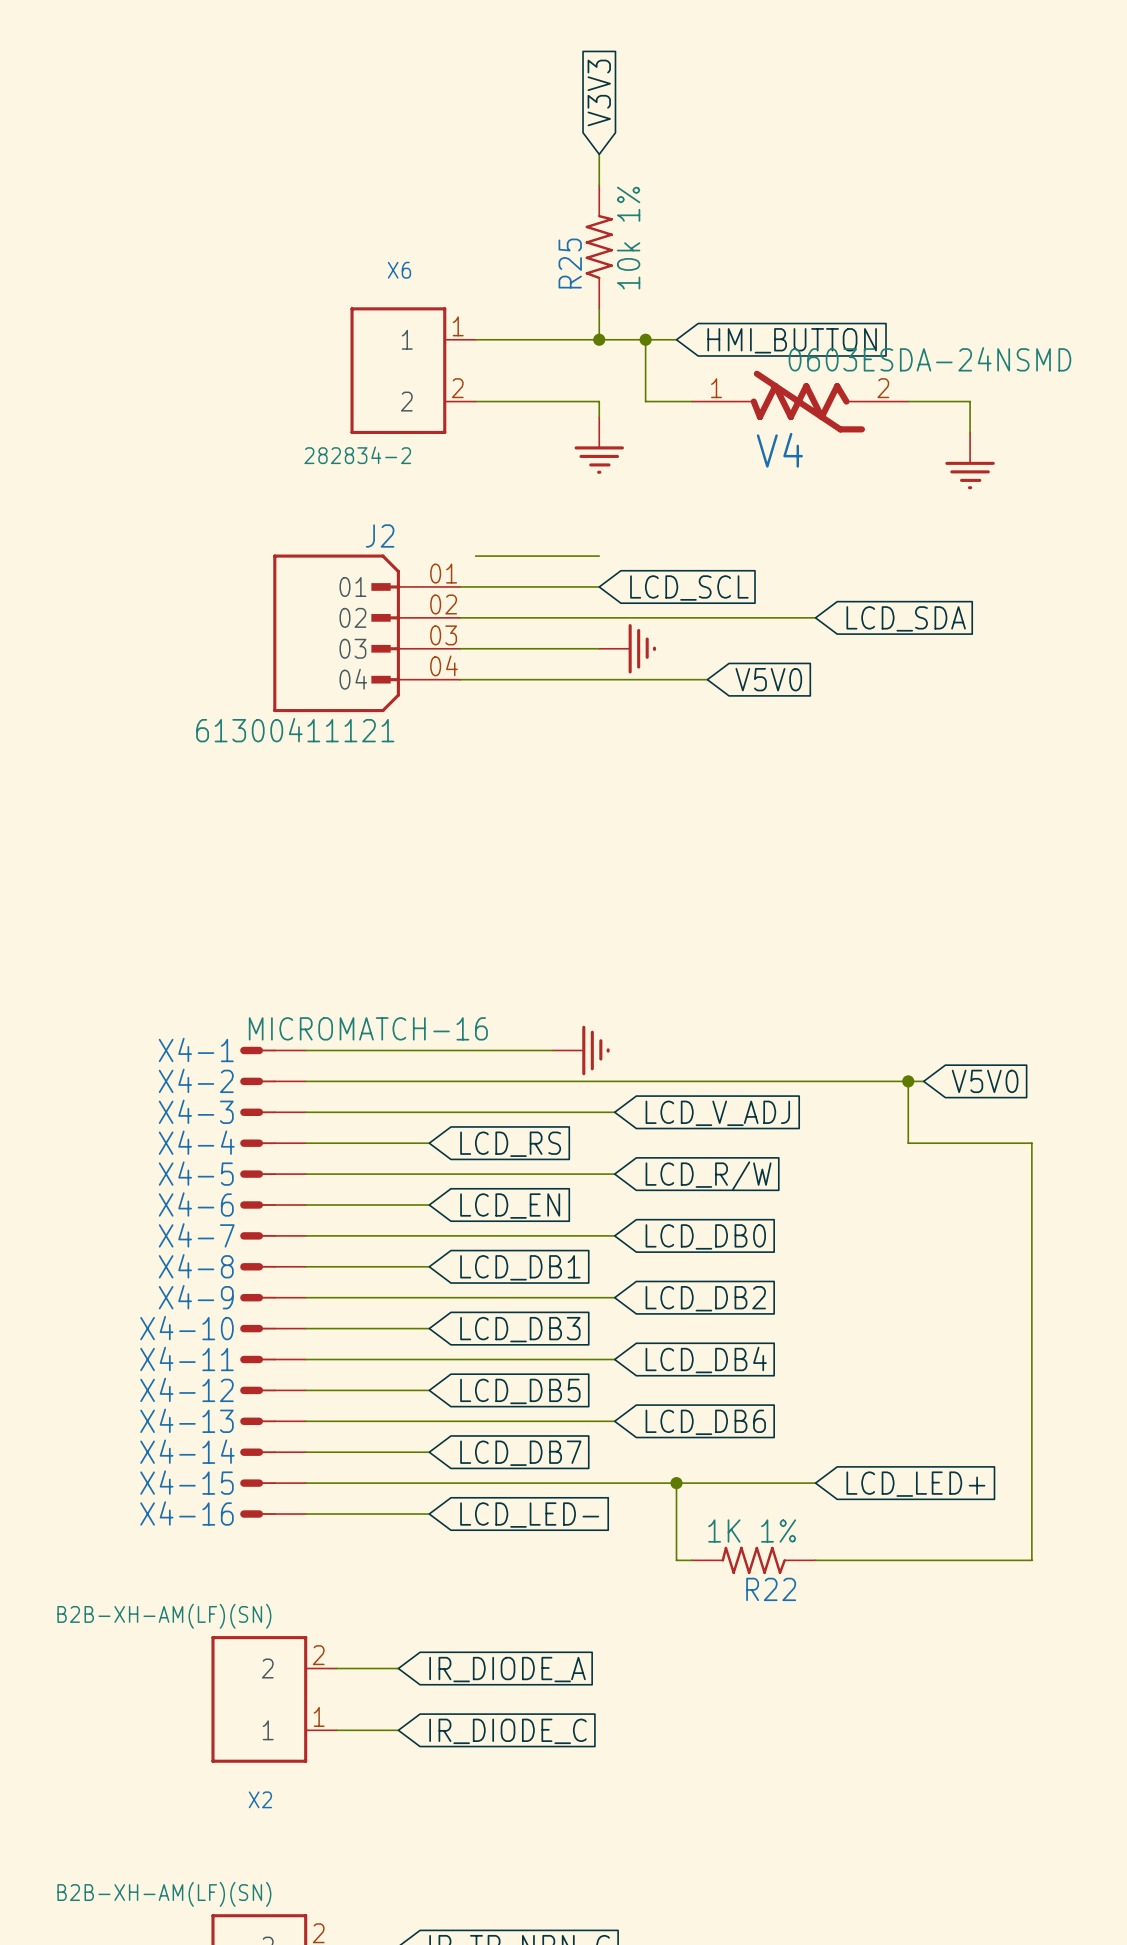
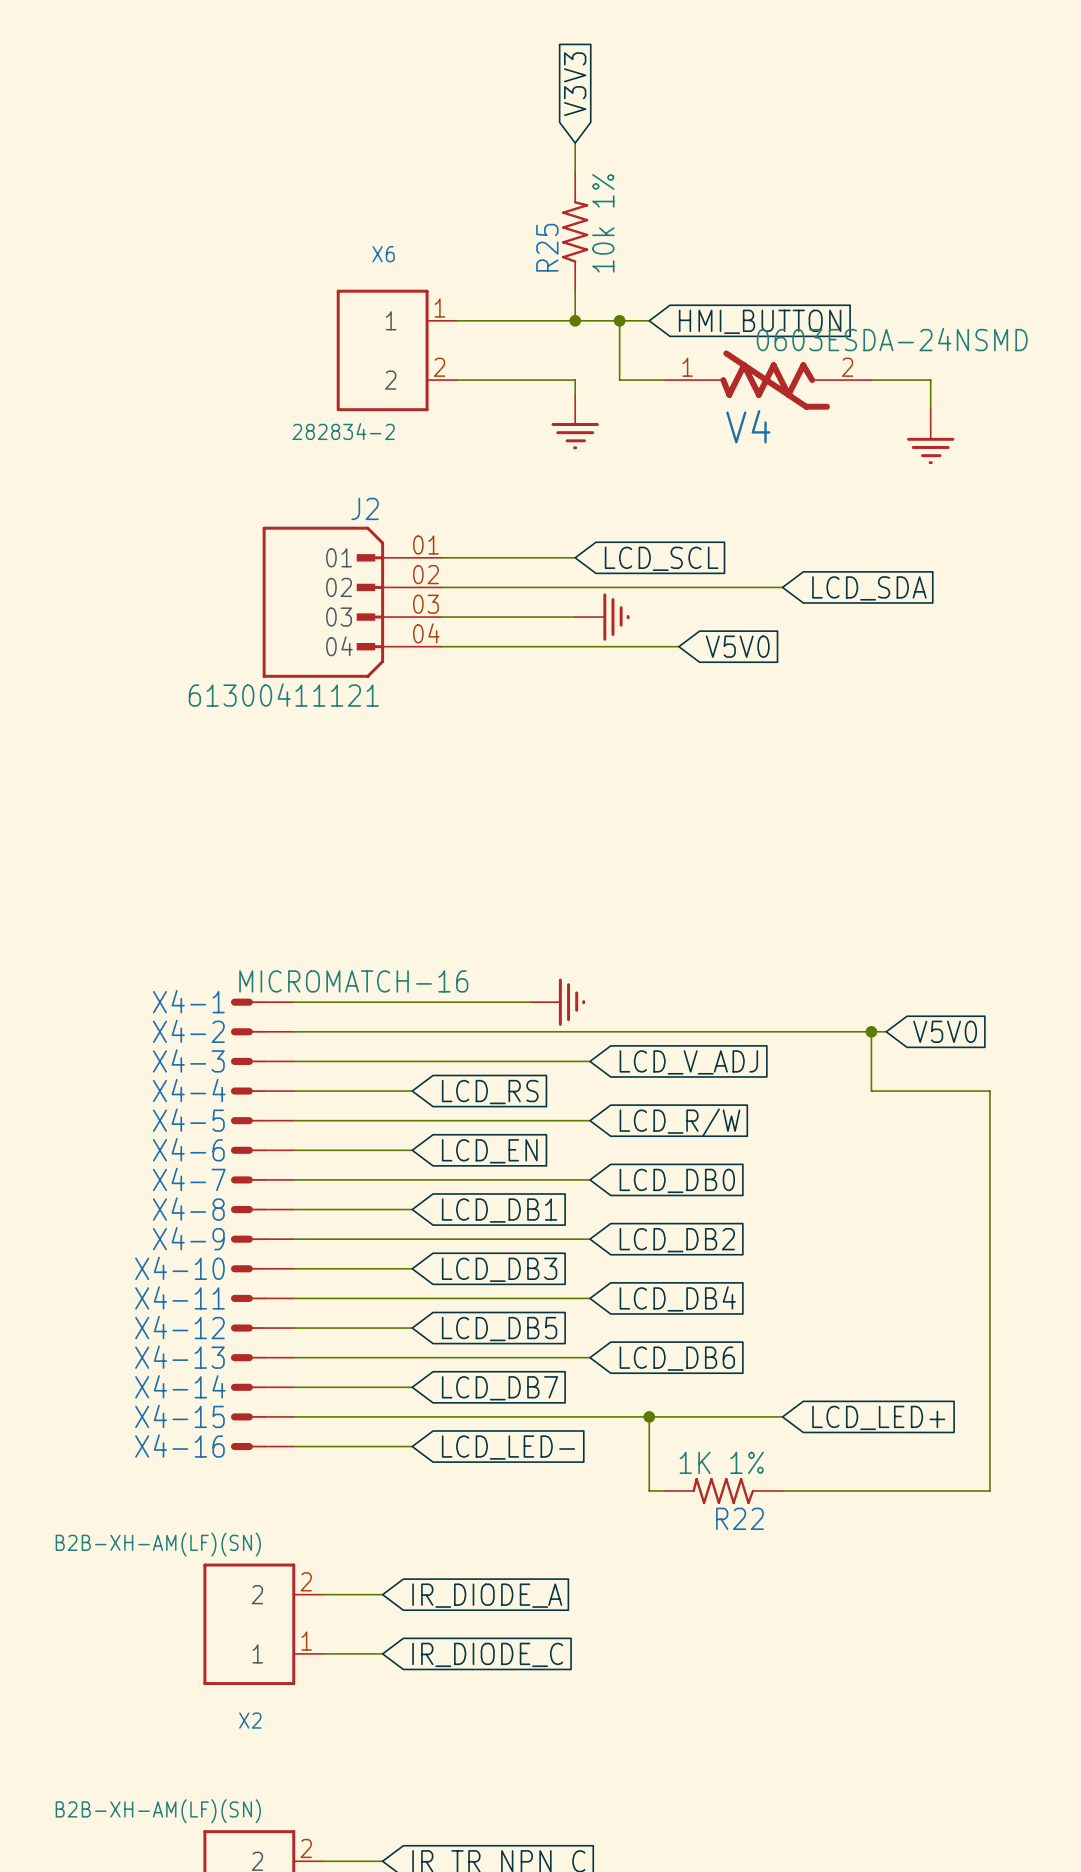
wire: (475, 556) (599, 556) -> none

